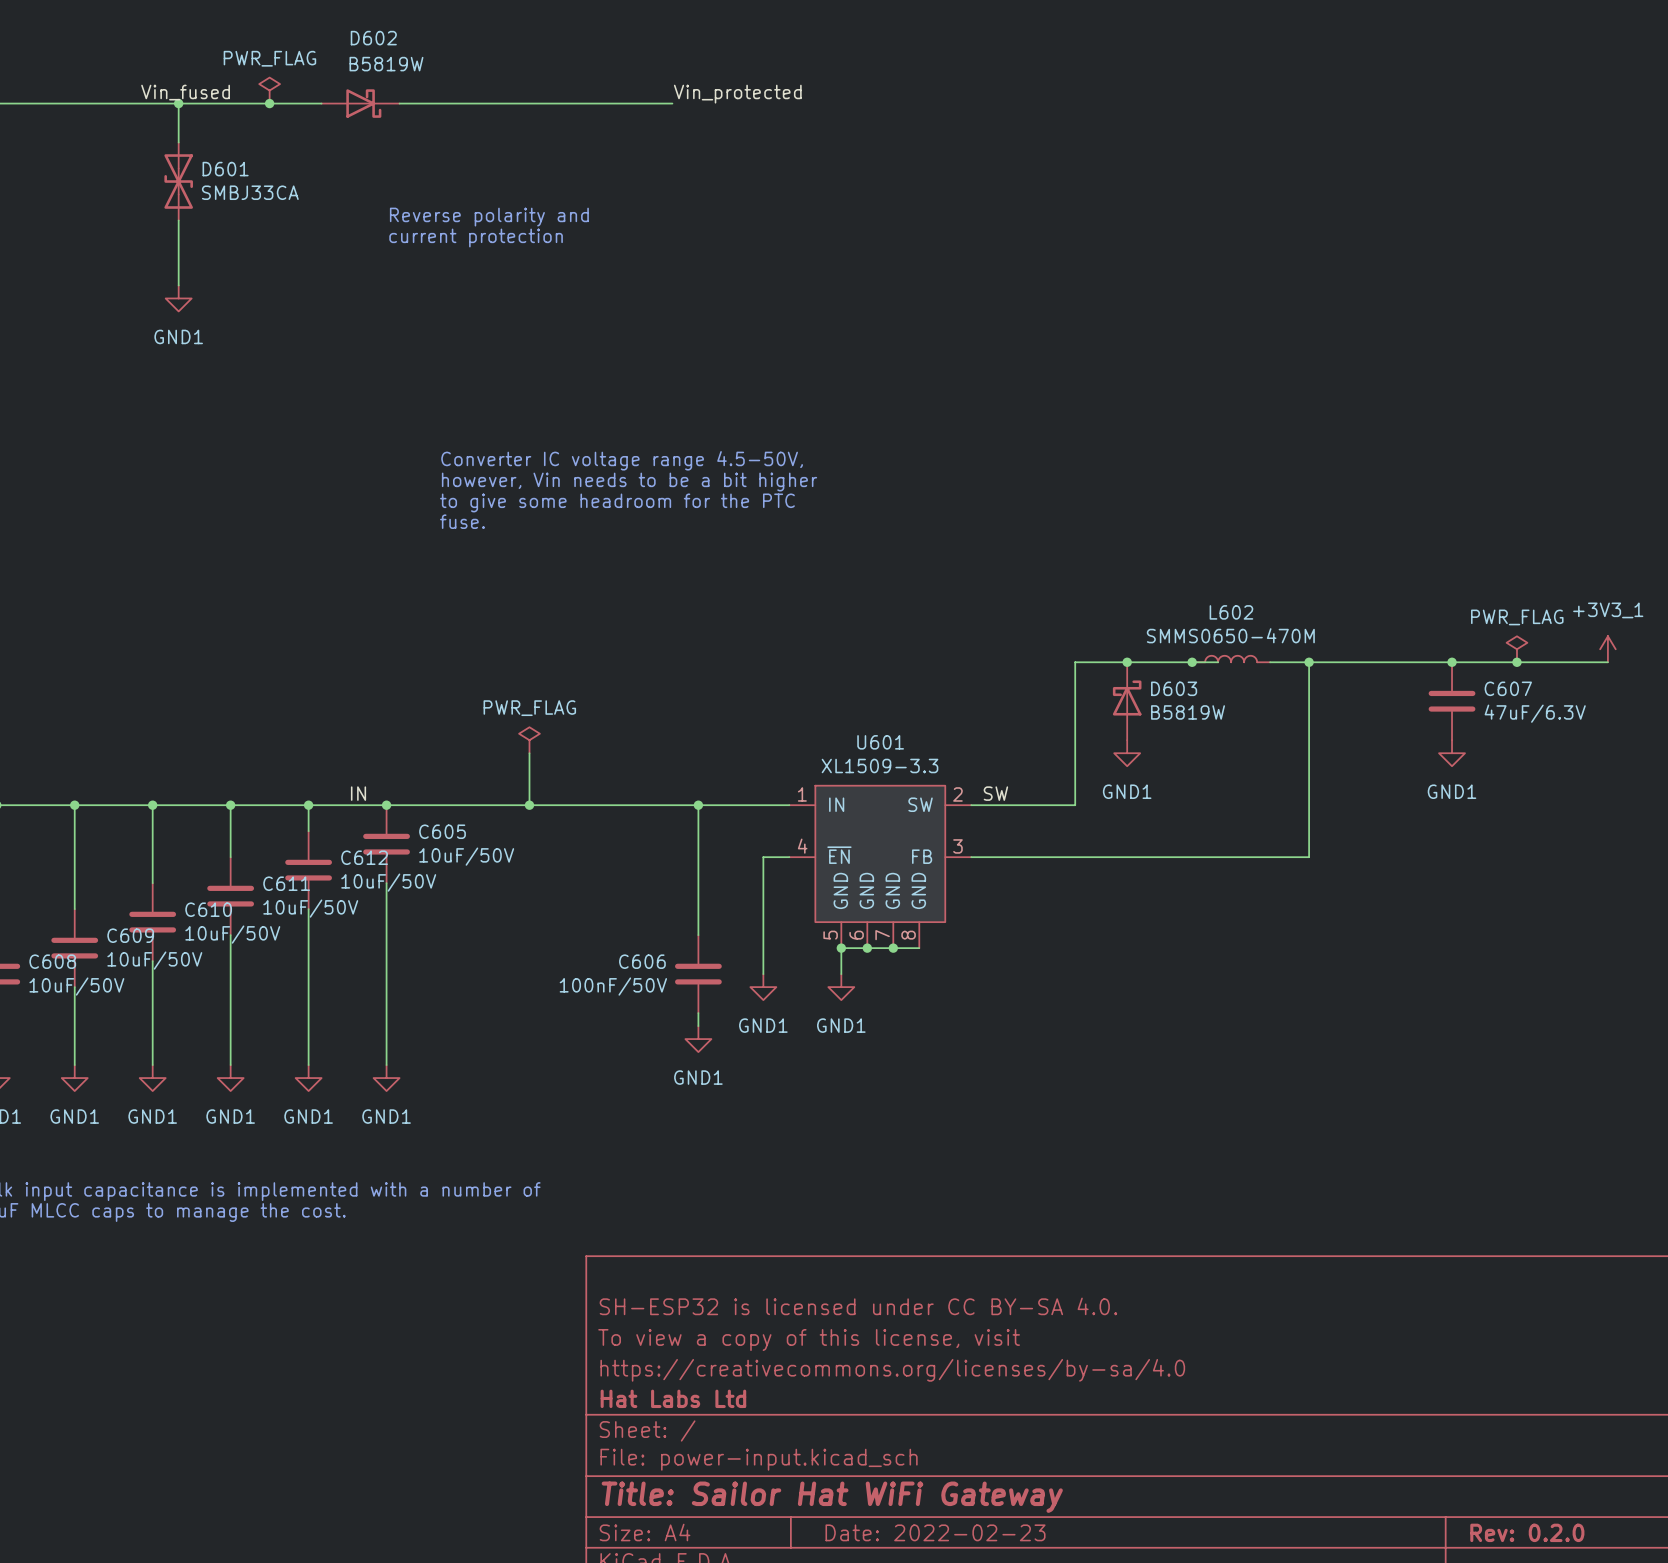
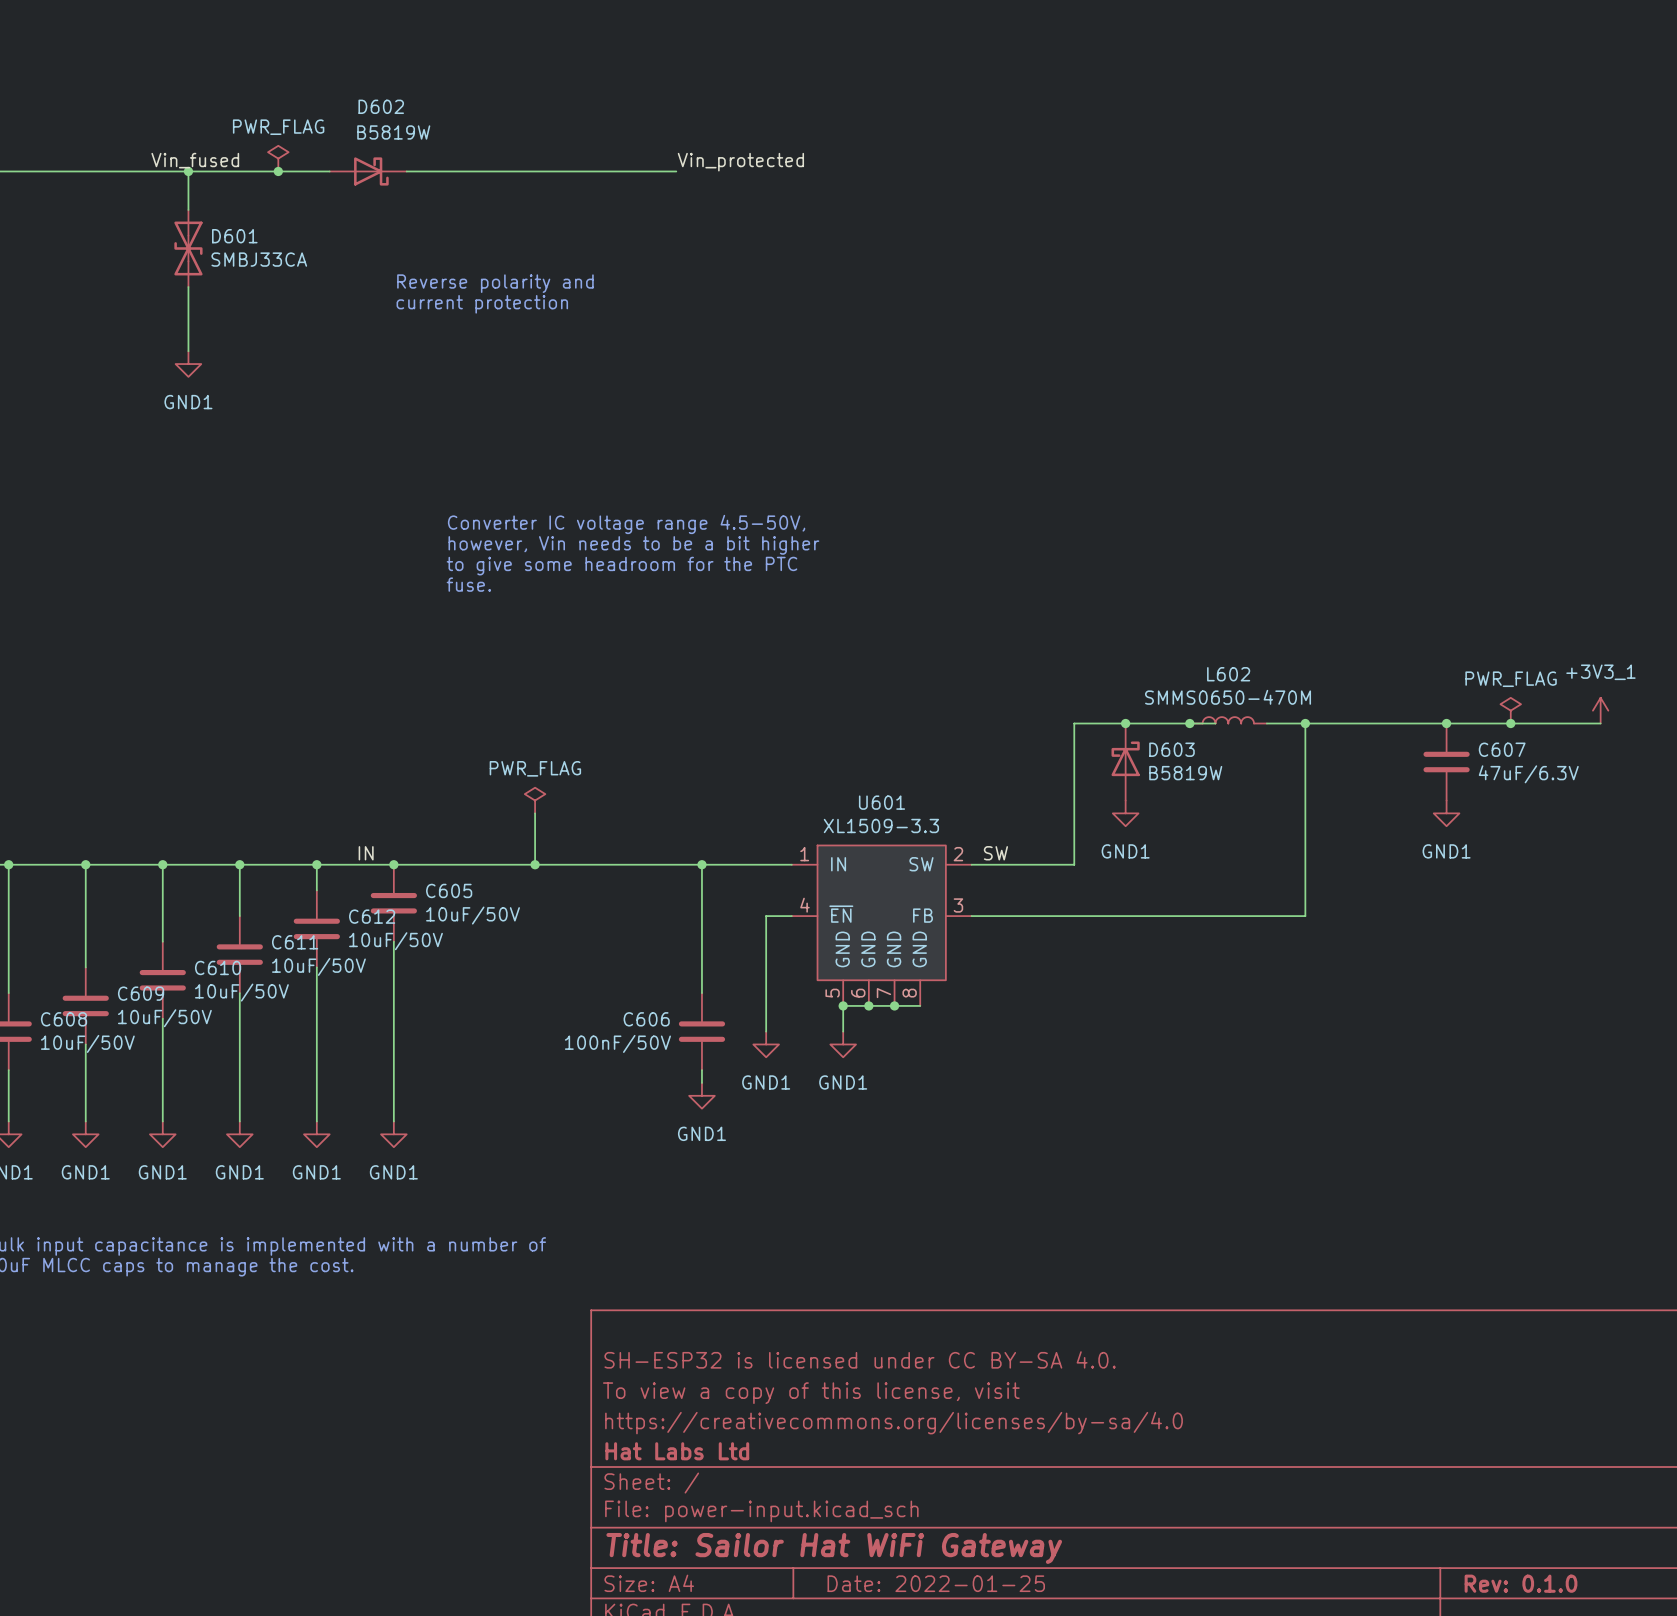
title block: Date: 2022-02-23 (935, 1532) -> Date: 2022-01-25 (936, 1583)
title block: Rev: 0.2.0 (1527, 1532) -> Rev: 0.1.0 (1521, 1583)

